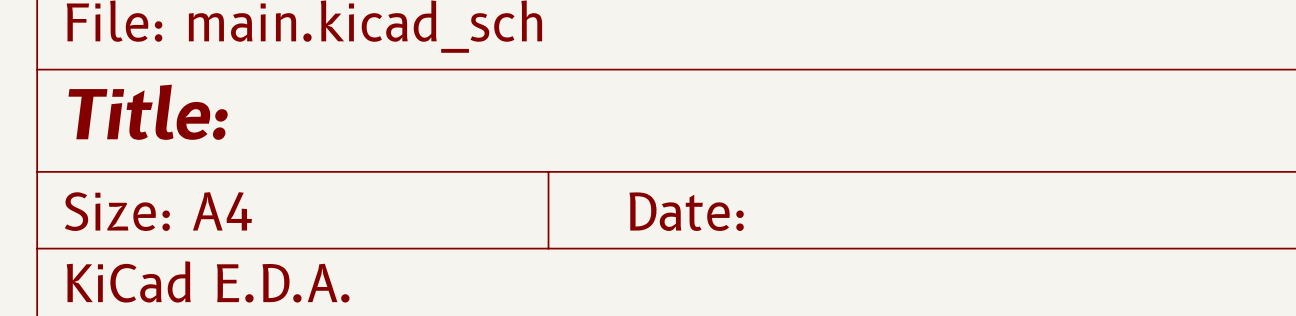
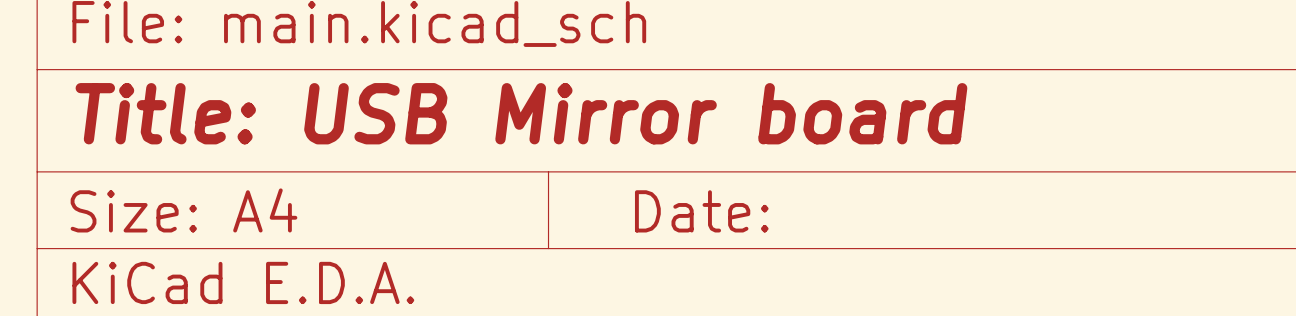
title block: Title: (148, 112) -> Title: USB Mirror board (521, 113)

